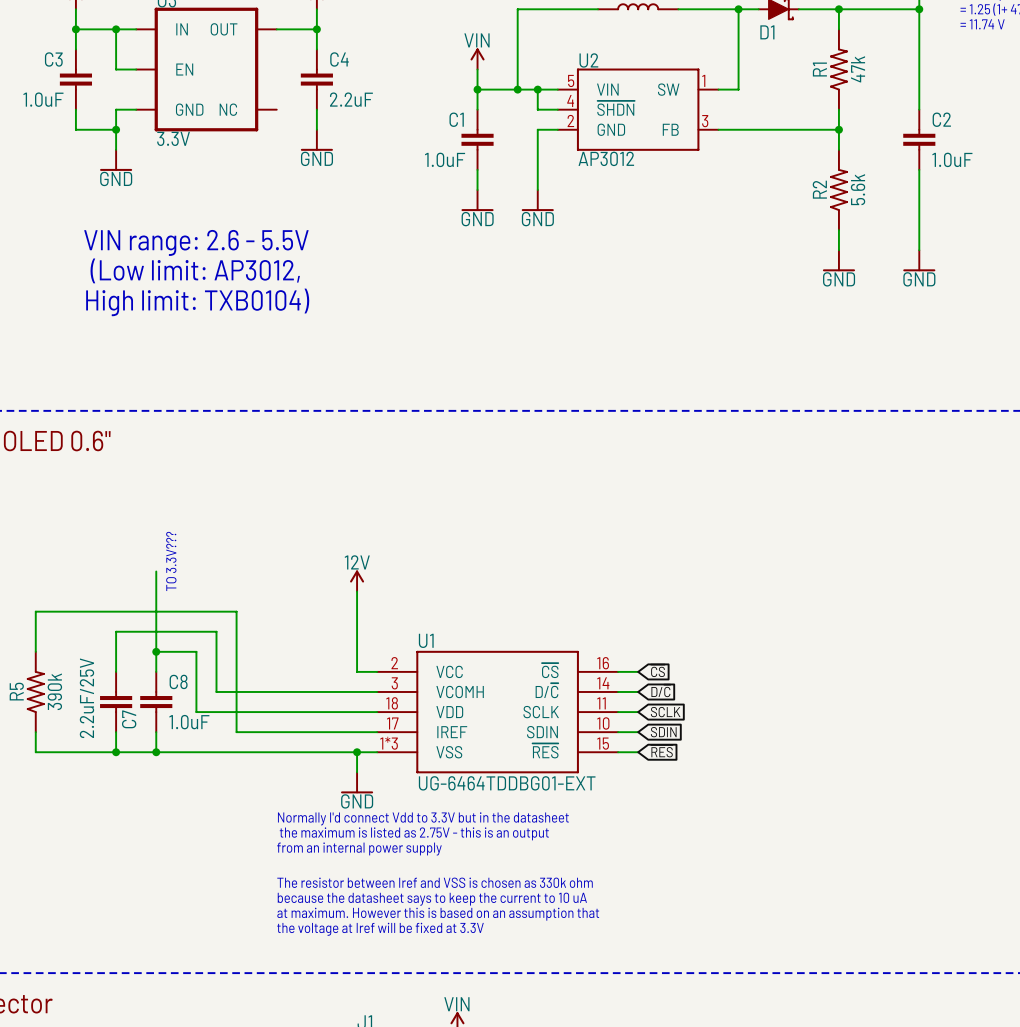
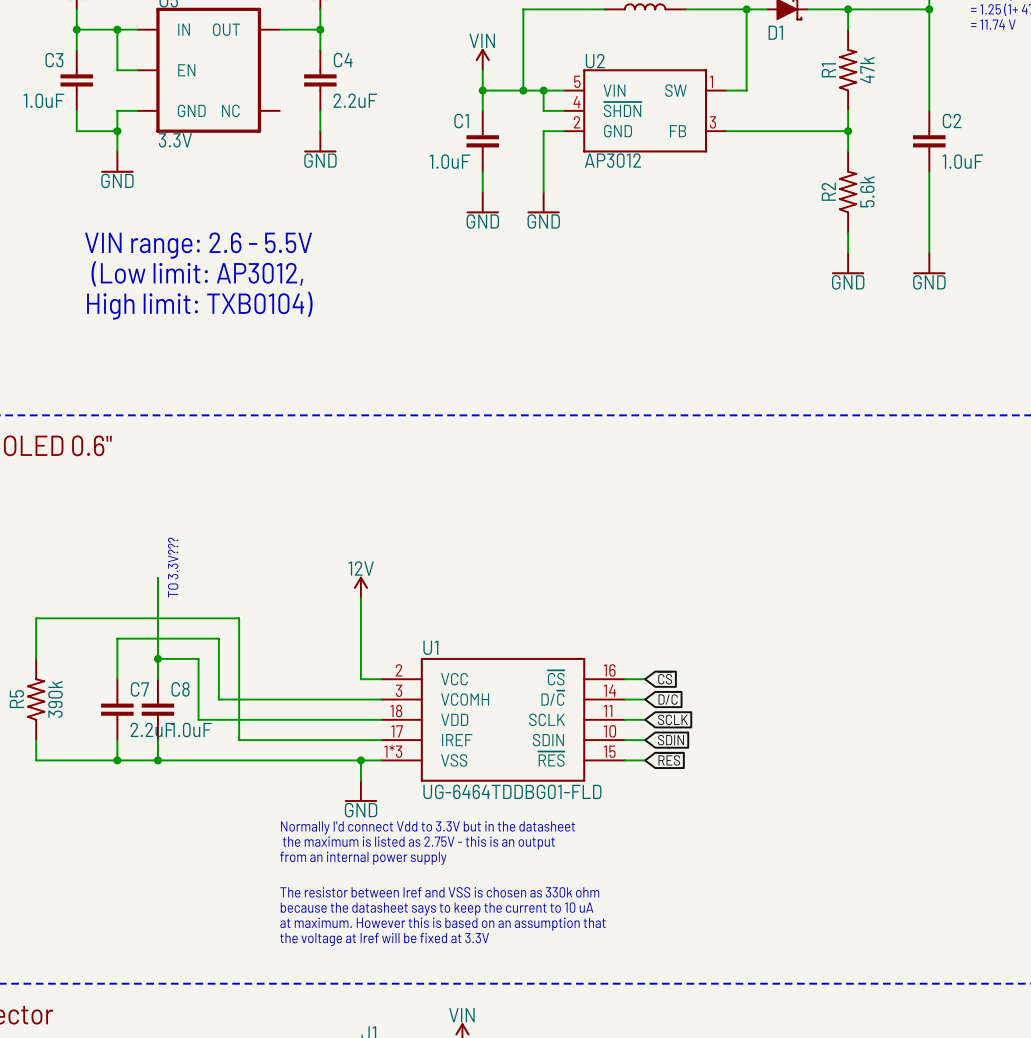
C7 value: 2.2uF/25V (86, 698) -> 2.2uF (152, 729)
C7 name rotation: 0° (129, 719) -> 90° clockwise (139, 689)
C7 name position: C7 (129, 719) -> C7 (139, 689)
U1 value: UG-6464TDDBG01-EXT (507, 783) -> UG-6464TDDBG01-FLD (512, 791)

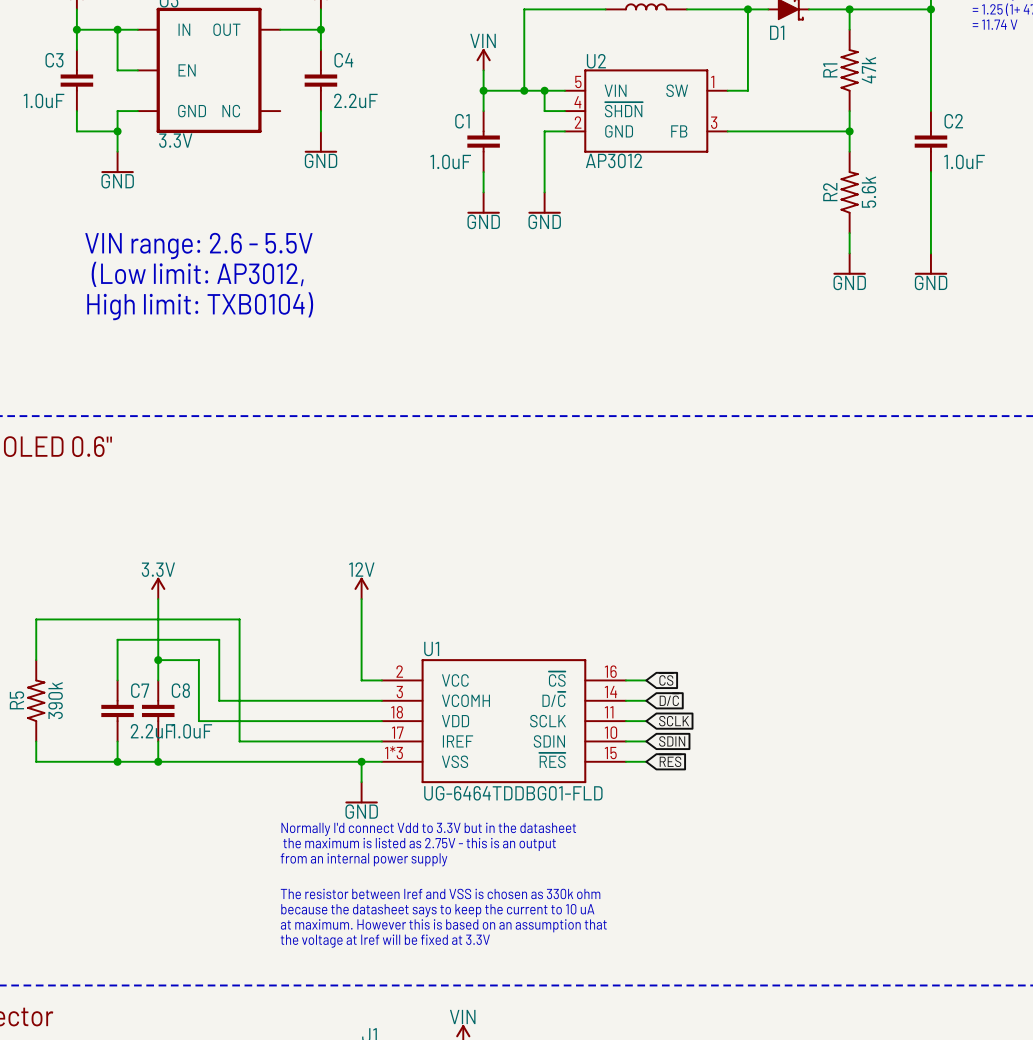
text: TO 3.3V??? (173, 567) -> none
power symbol: none -> 3.3V (158, 588)

